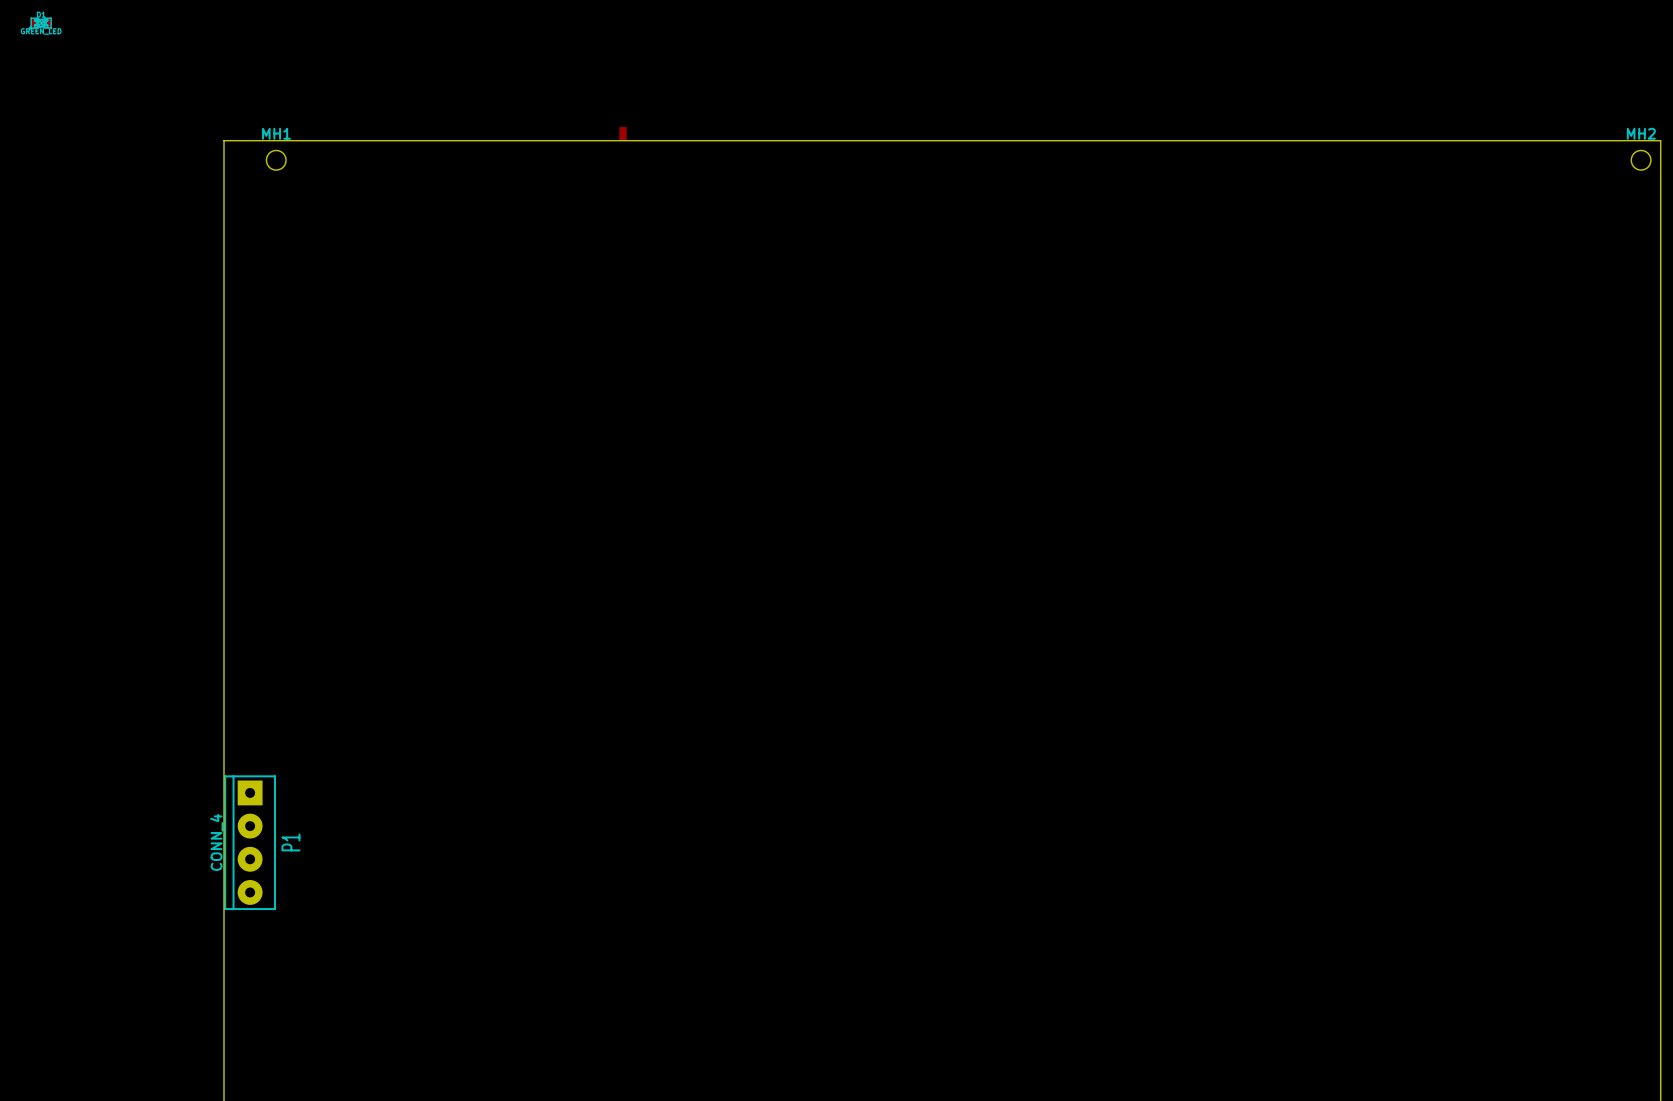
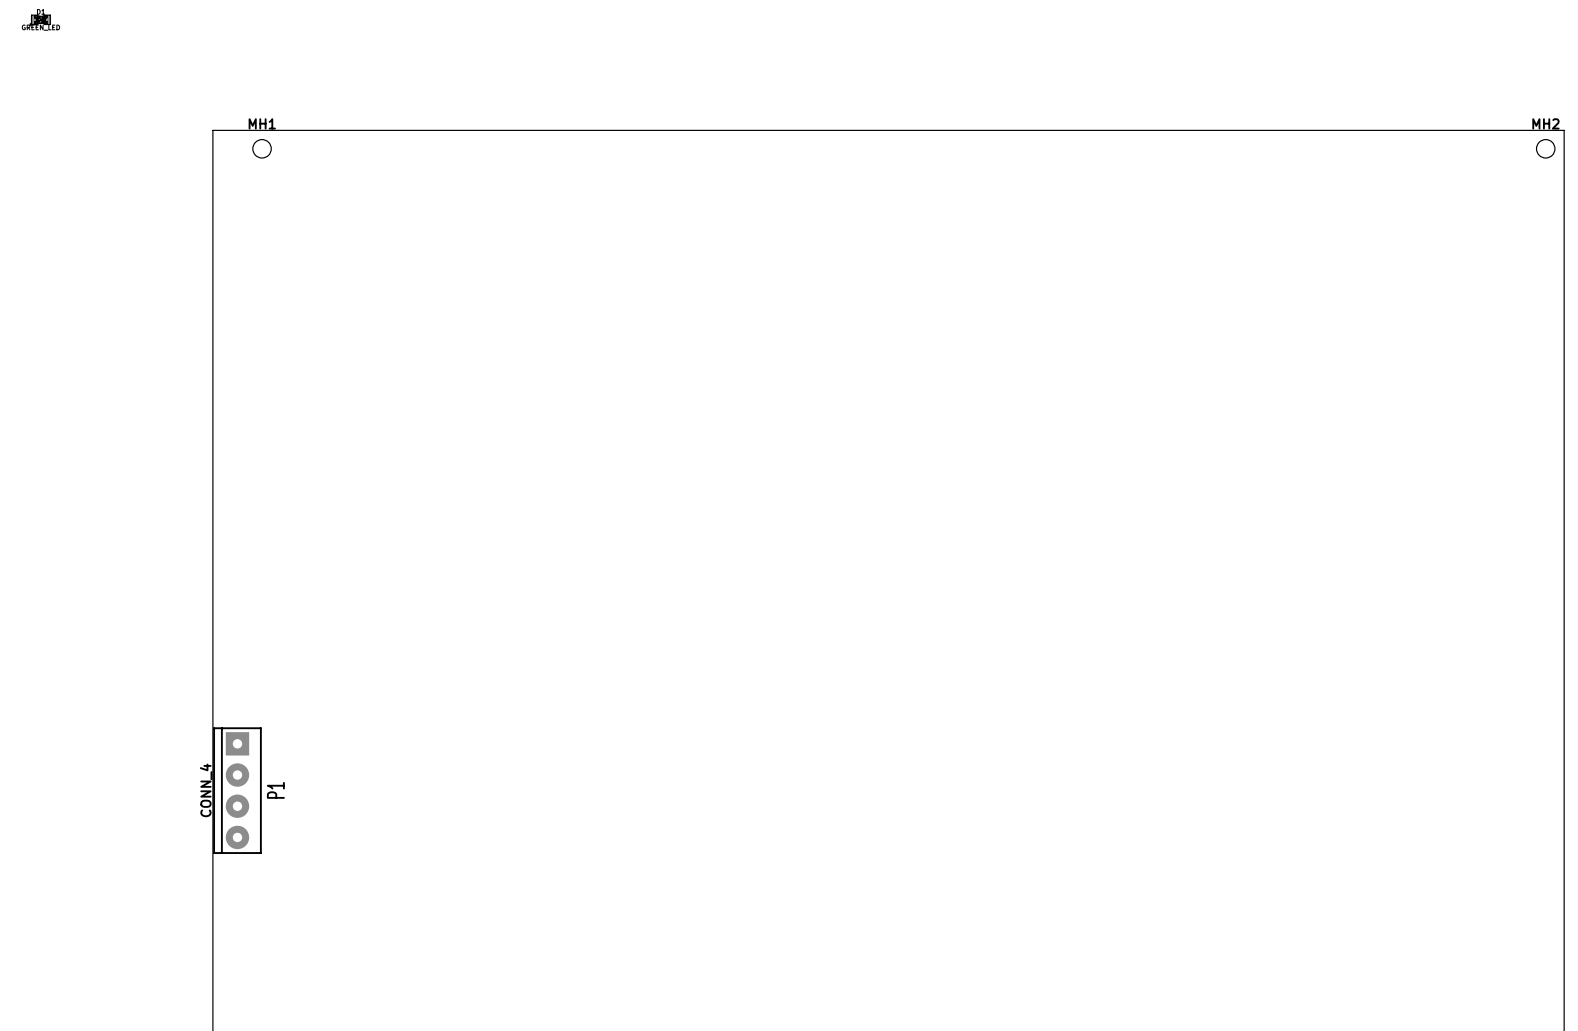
part: (623, 133) -> none

